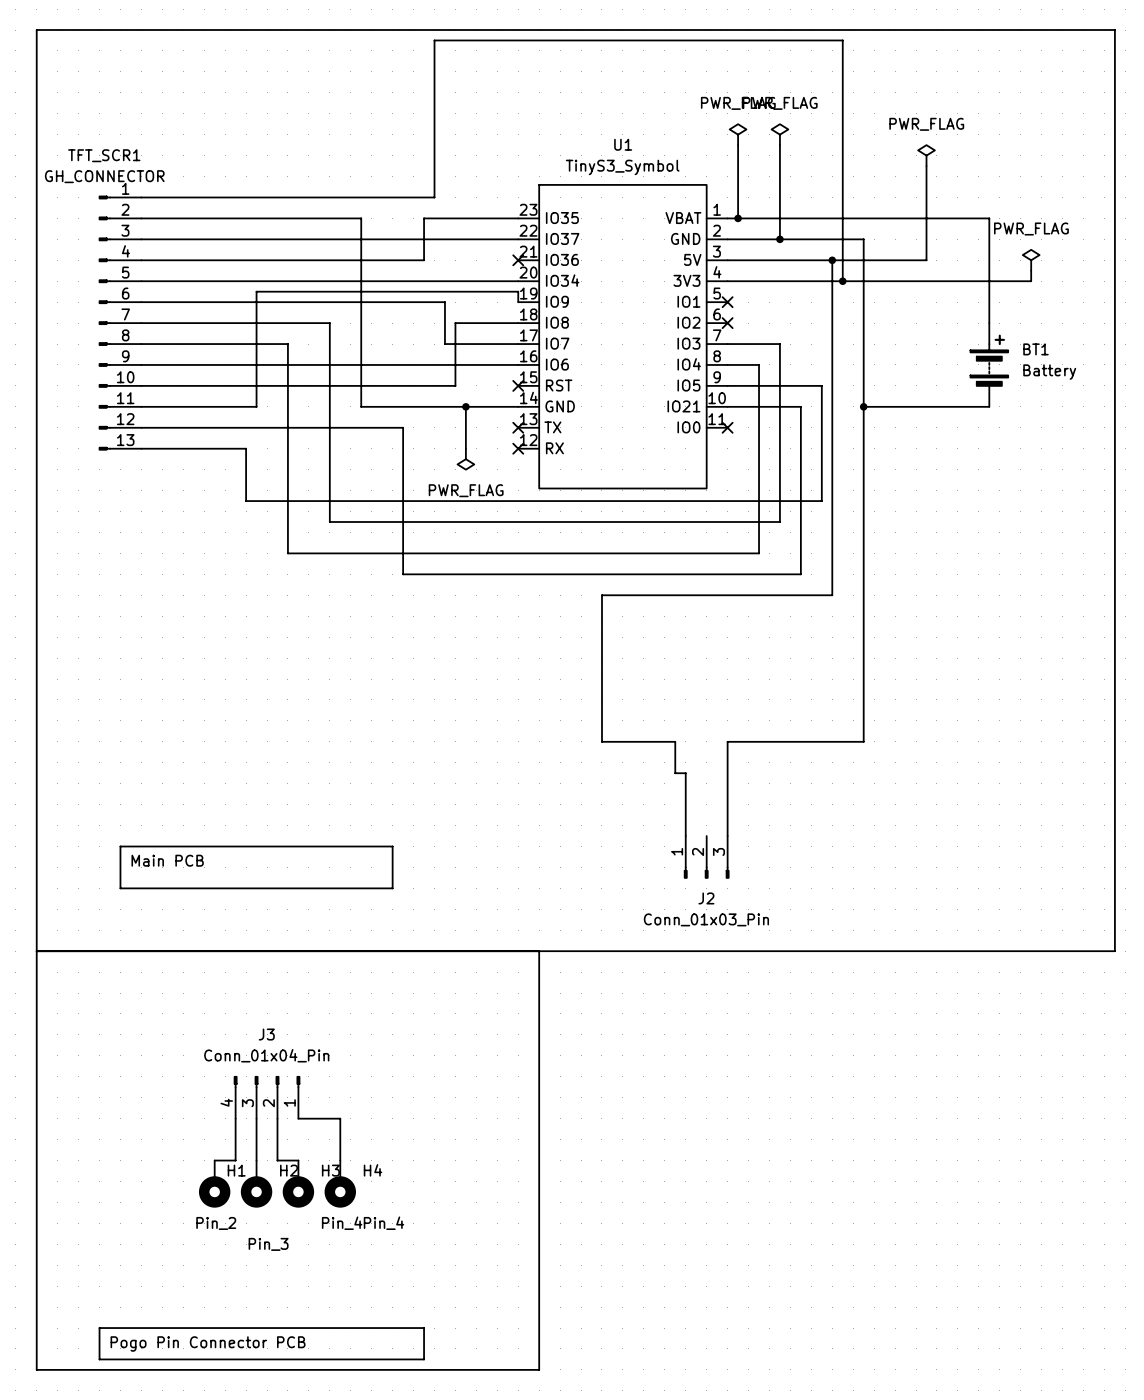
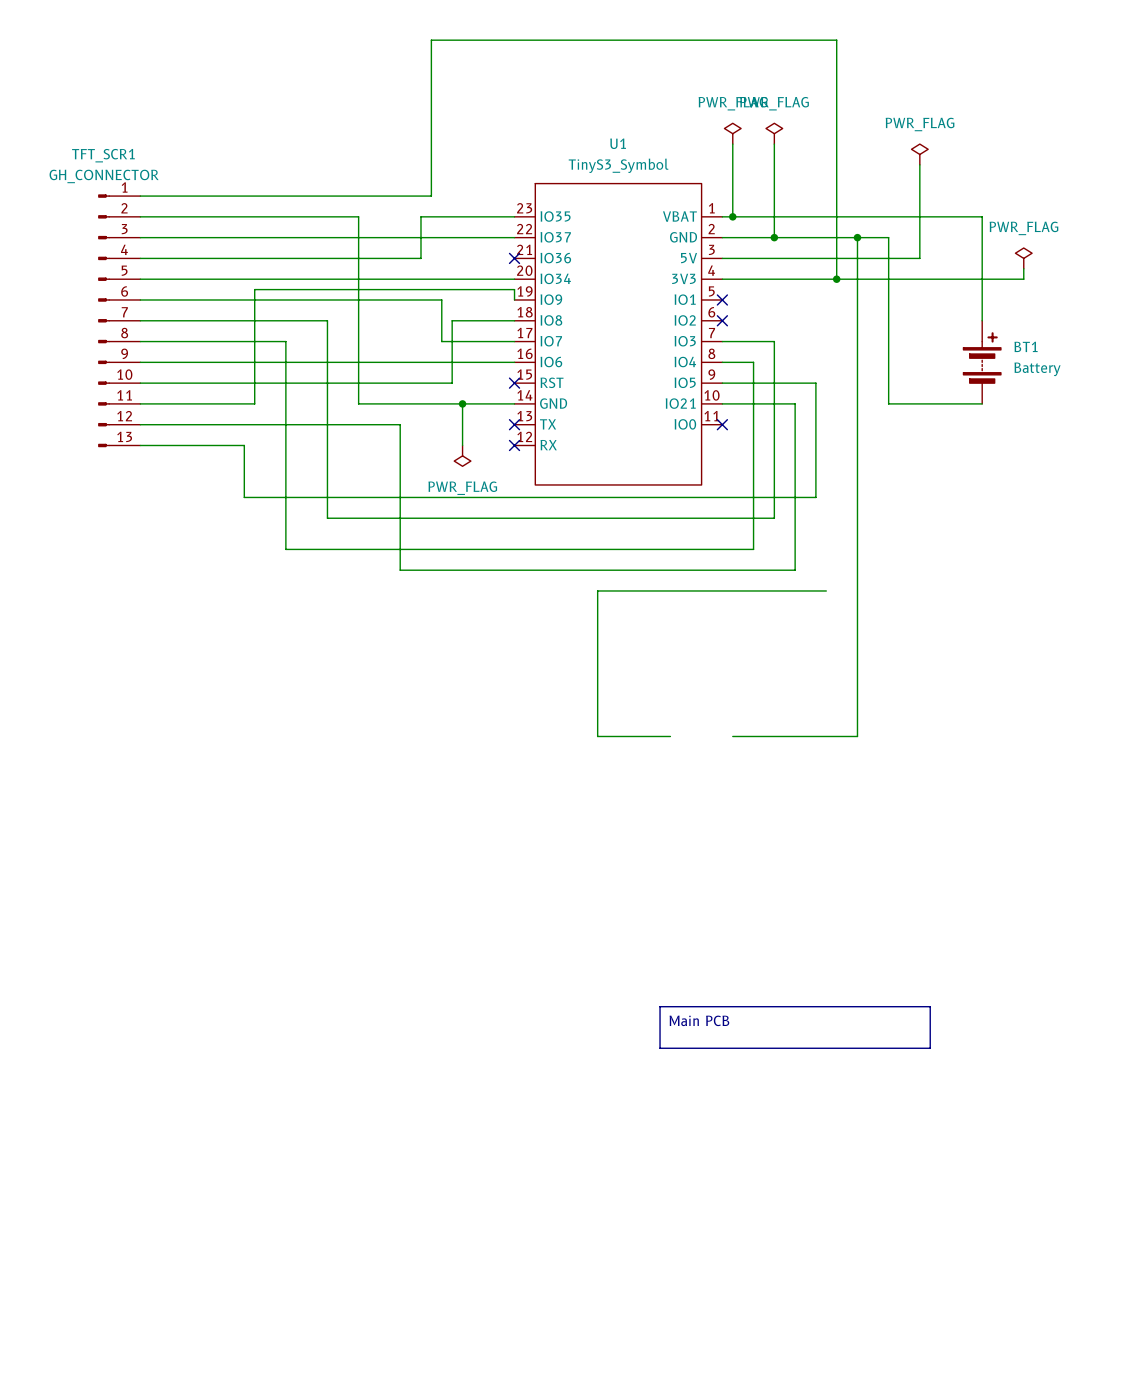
wire: (832, 260) (832, 595) -> none
junction position: (832, 260) -> (857, 237)
wire: (863, 406) (895, 406) -> (857, 237) (888, 237) (888, 403)
junction: (863, 406) -> none
wire: (675, 741) (675, 773) (685, 773) (685, 836) -> none
wire: (738, 741) (727, 741) (727, 836) -> none
line: (120, 846) (392, 846) (392, 888) (120, 888) (120, 846) -> none
J2: Conn_01x03_Pin (706, 857) -> none
text: Main PCB (167, 860) -> none
line: (36, 951) (1114, 951) (1114, 30) (36, 30) (36, 1369) (539, 1369) (539, 951) -> none
line: none -> (660, 1006) (930, 1006) (930, 1048) (660, 1048) (660, 1006)
text: none -> Main PCB (699, 1020)
J3: Conn_01x04_Pin (267, 1097) -> none
wire: (235, 1118) (235, 1160) (214, 1160) -> none
wire: (256, 1118) (256, 1160) -> none
wire: (277, 1118) (277, 1160) (298, 1160) -> none
wire: (298, 1118) (340, 1118) (340, 1160) -> none
H1: Pin_2 (214, 1184) -> none
H2: Pin_3 (256, 1184) -> none
H3: Pin_4 (298, 1184) -> none
H4: Pin_4 (340, 1184) -> none
line: (99, 1328) (424, 1328) (424, 1359) (99, 1359) (99, 1328) -> none
text: Pogo Pin Connector PCB (208, 1343) -> none

